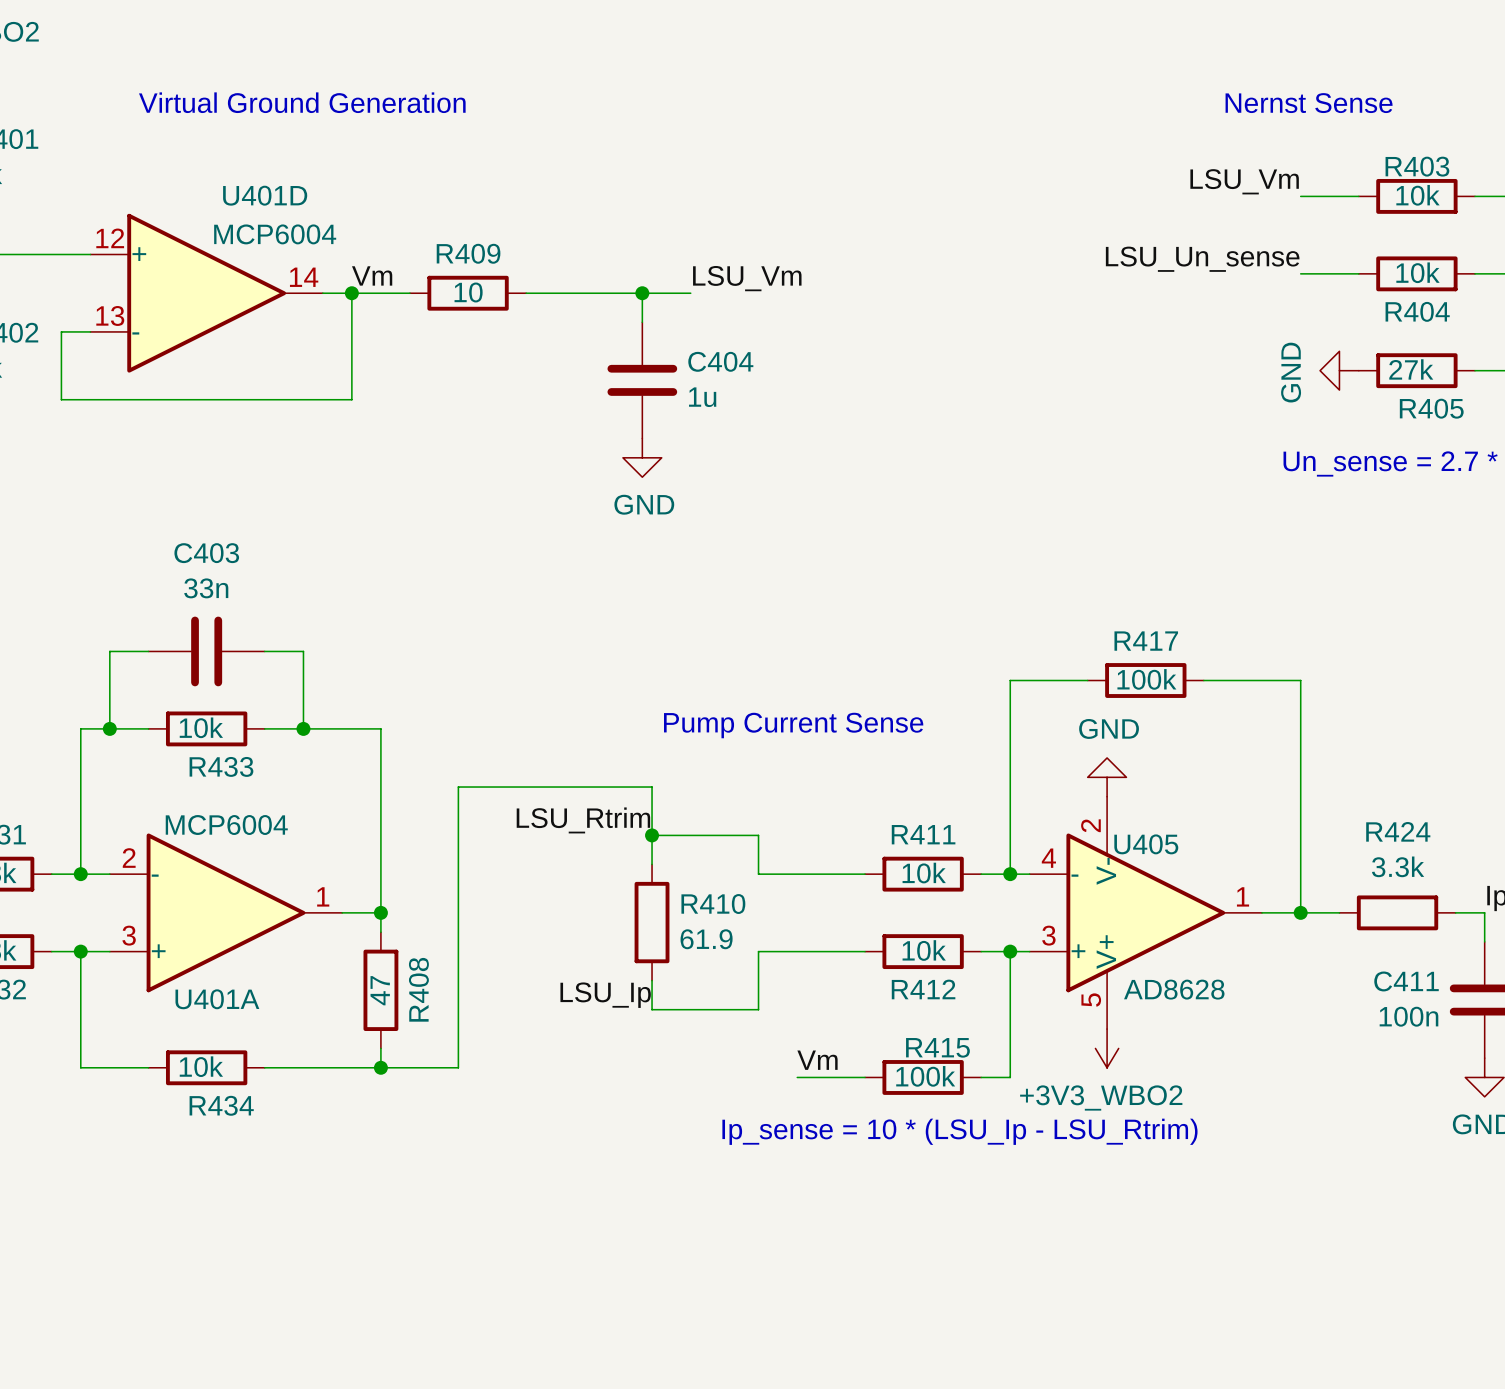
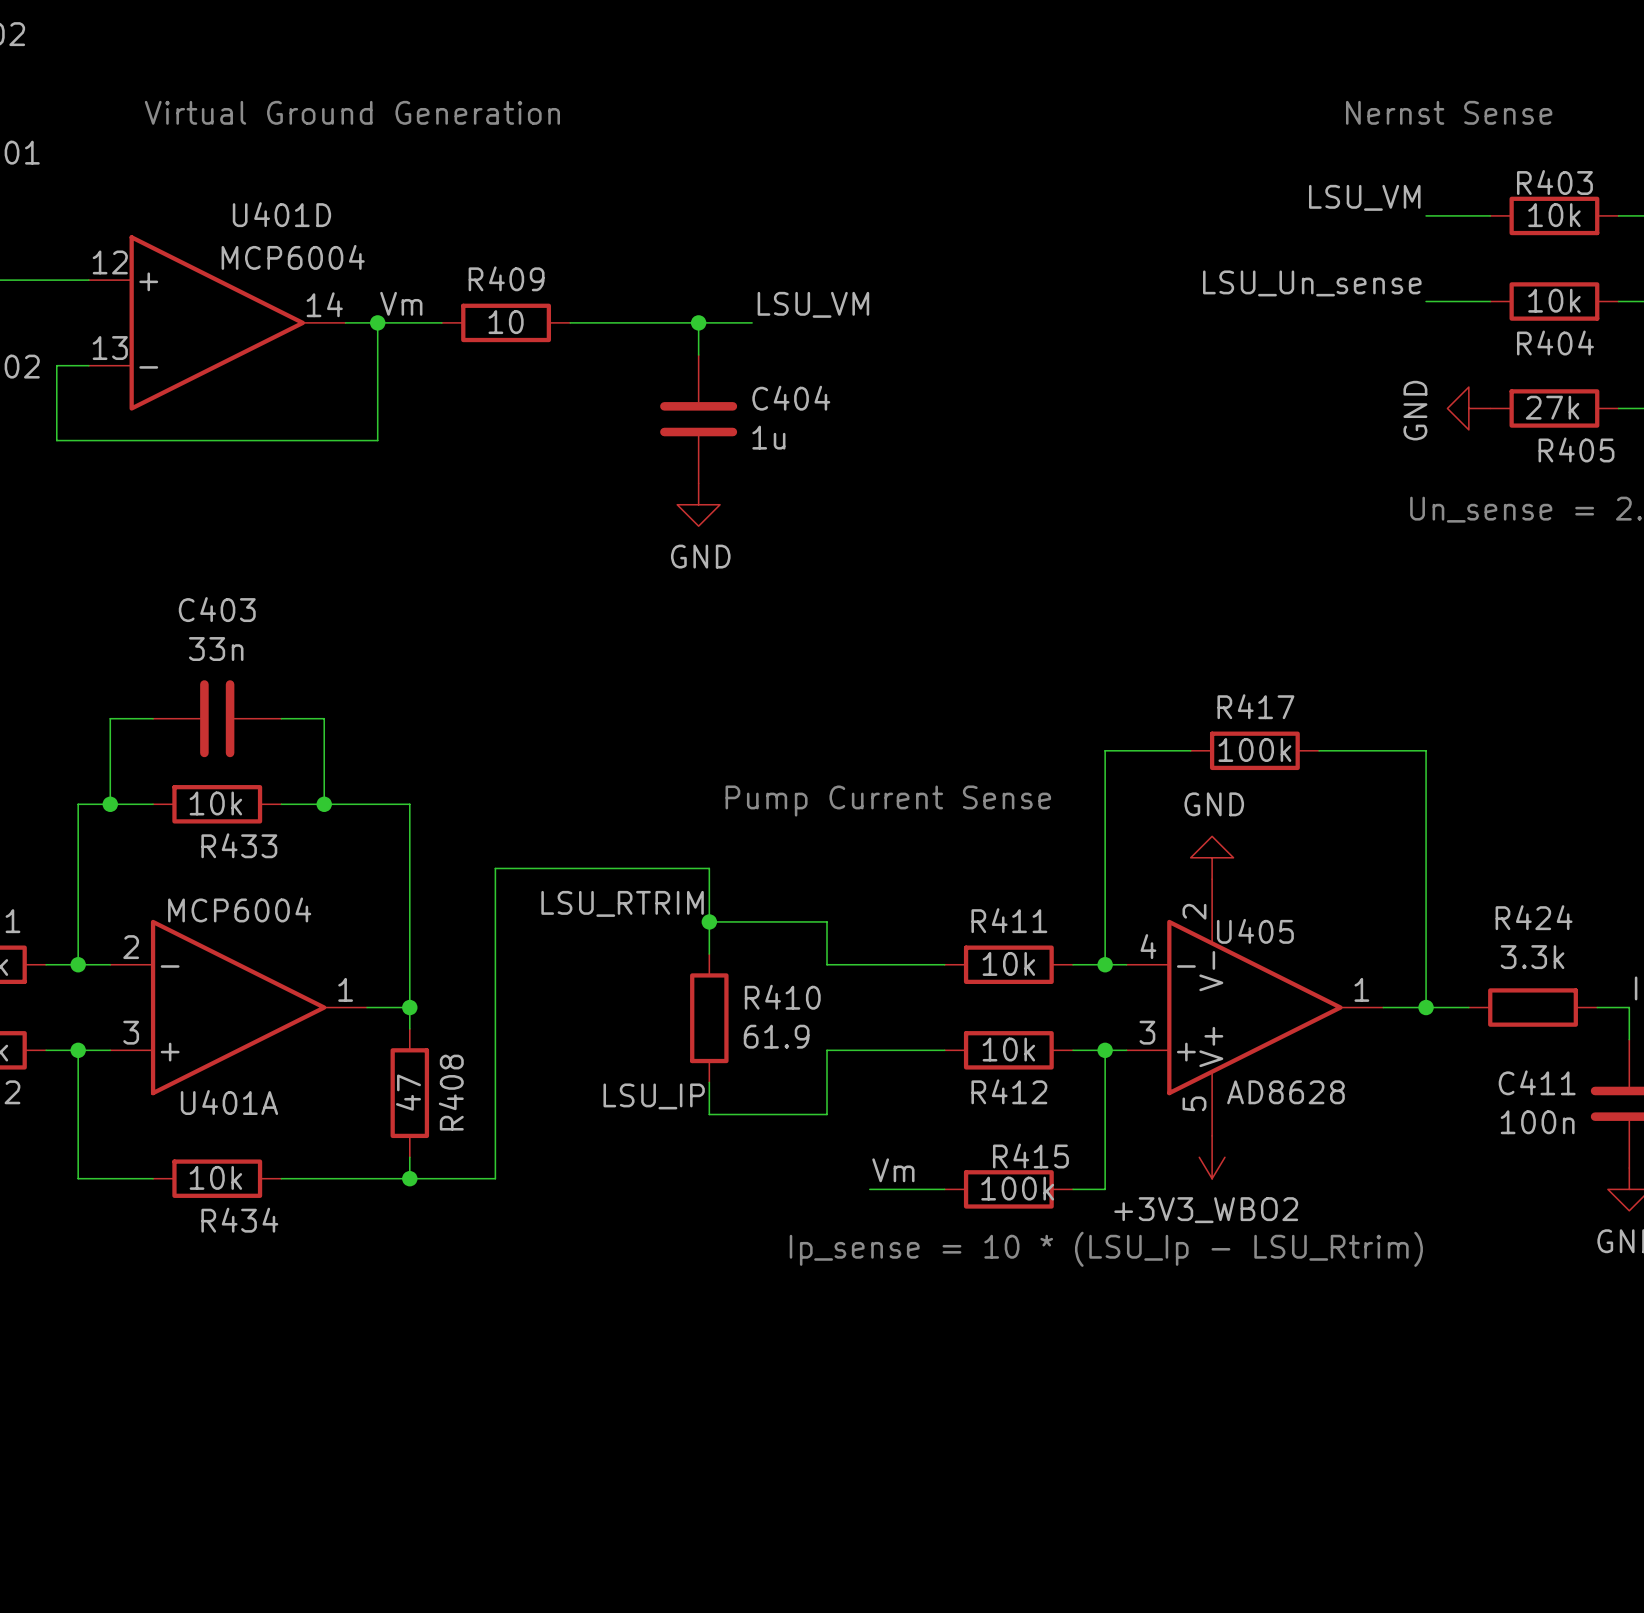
label: LSU_Vm (1244, 181) -> LSU_VM (1364, 197)
label: LSU_Vm (747, 278) -> LSU_VM (813, 304)
label: LSU_Rtrim (583, 820) -> LSU_RTRIM (622, 903)
label: LSU_Ip (605, 995) -> LSU_IP (654, 1096)

